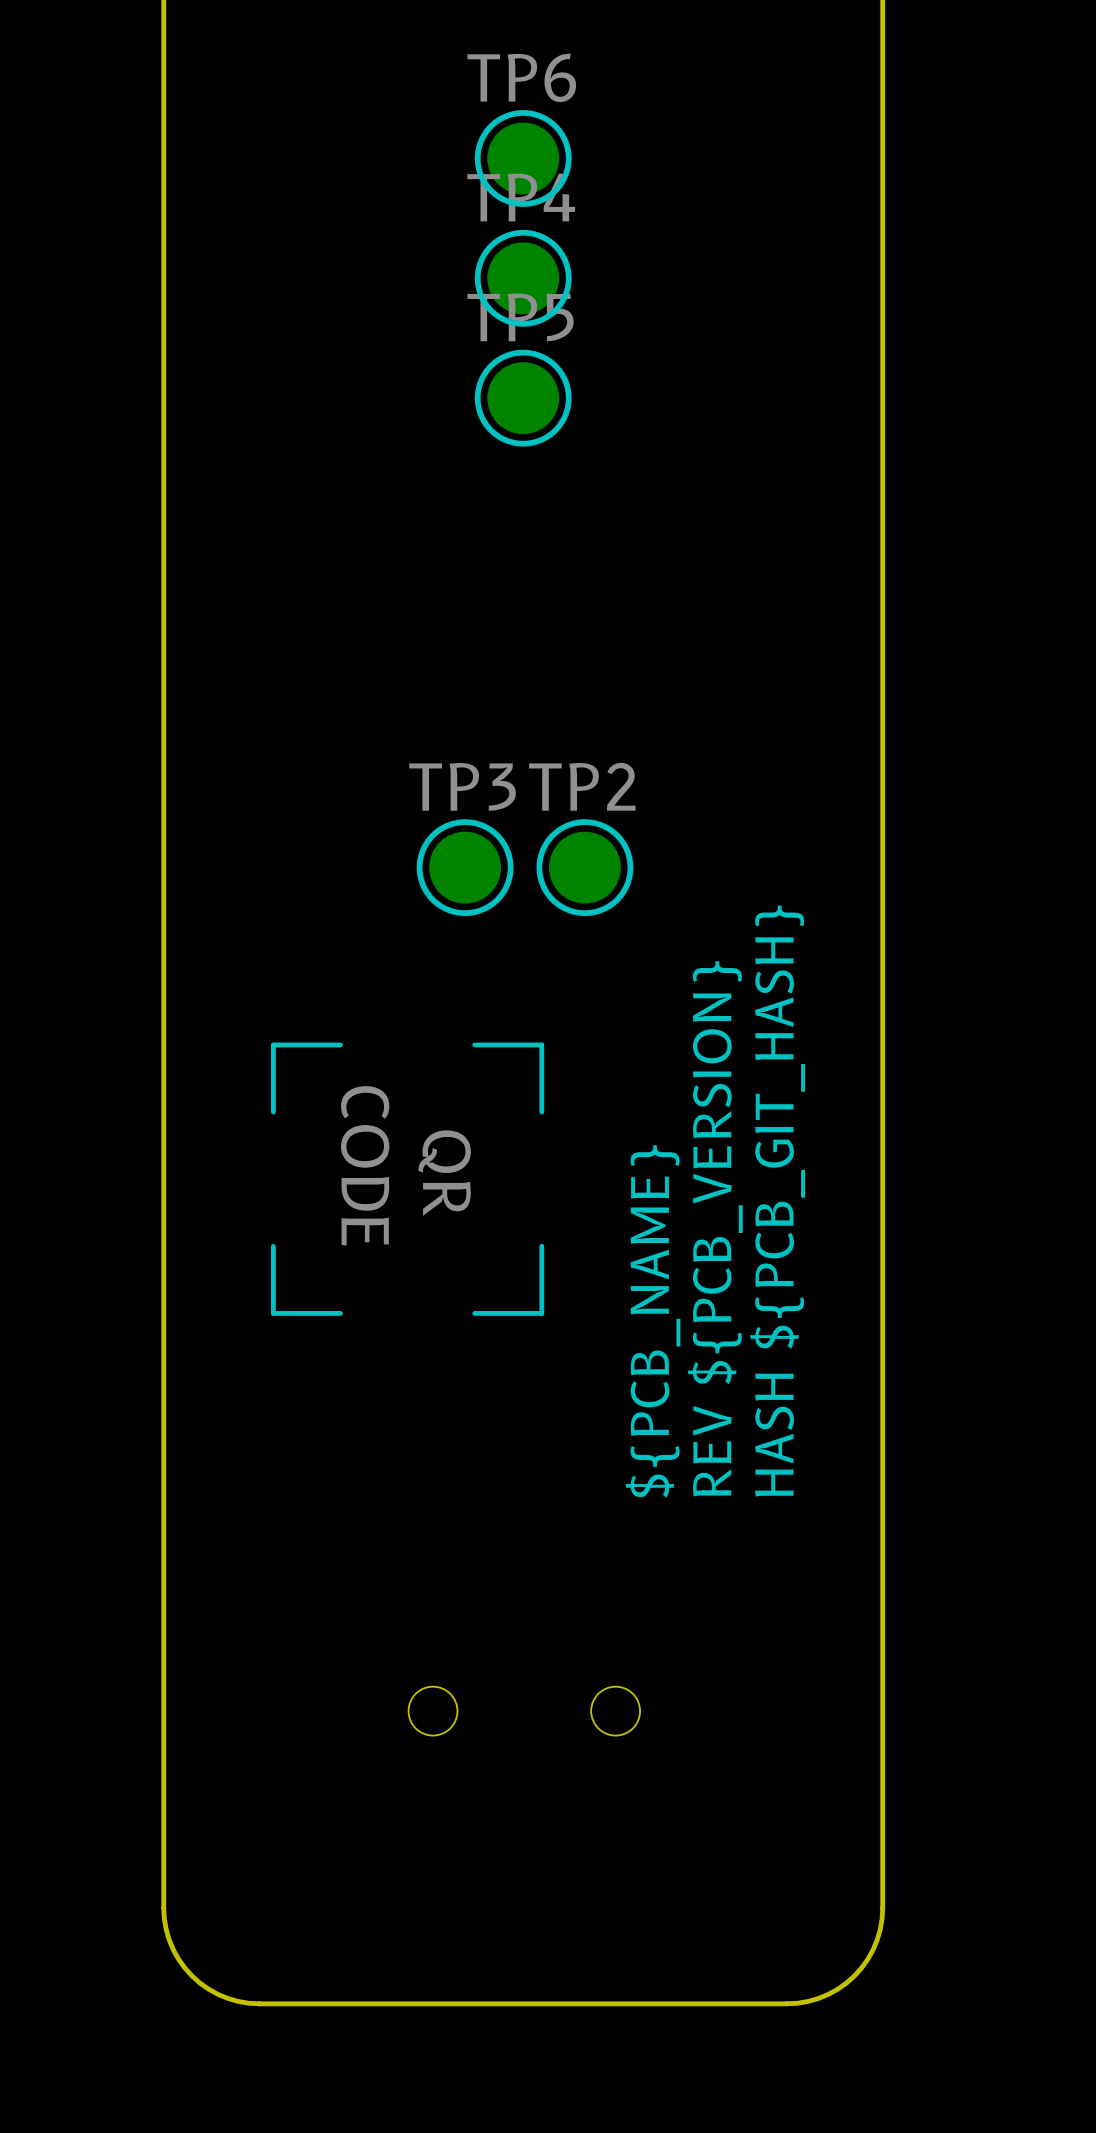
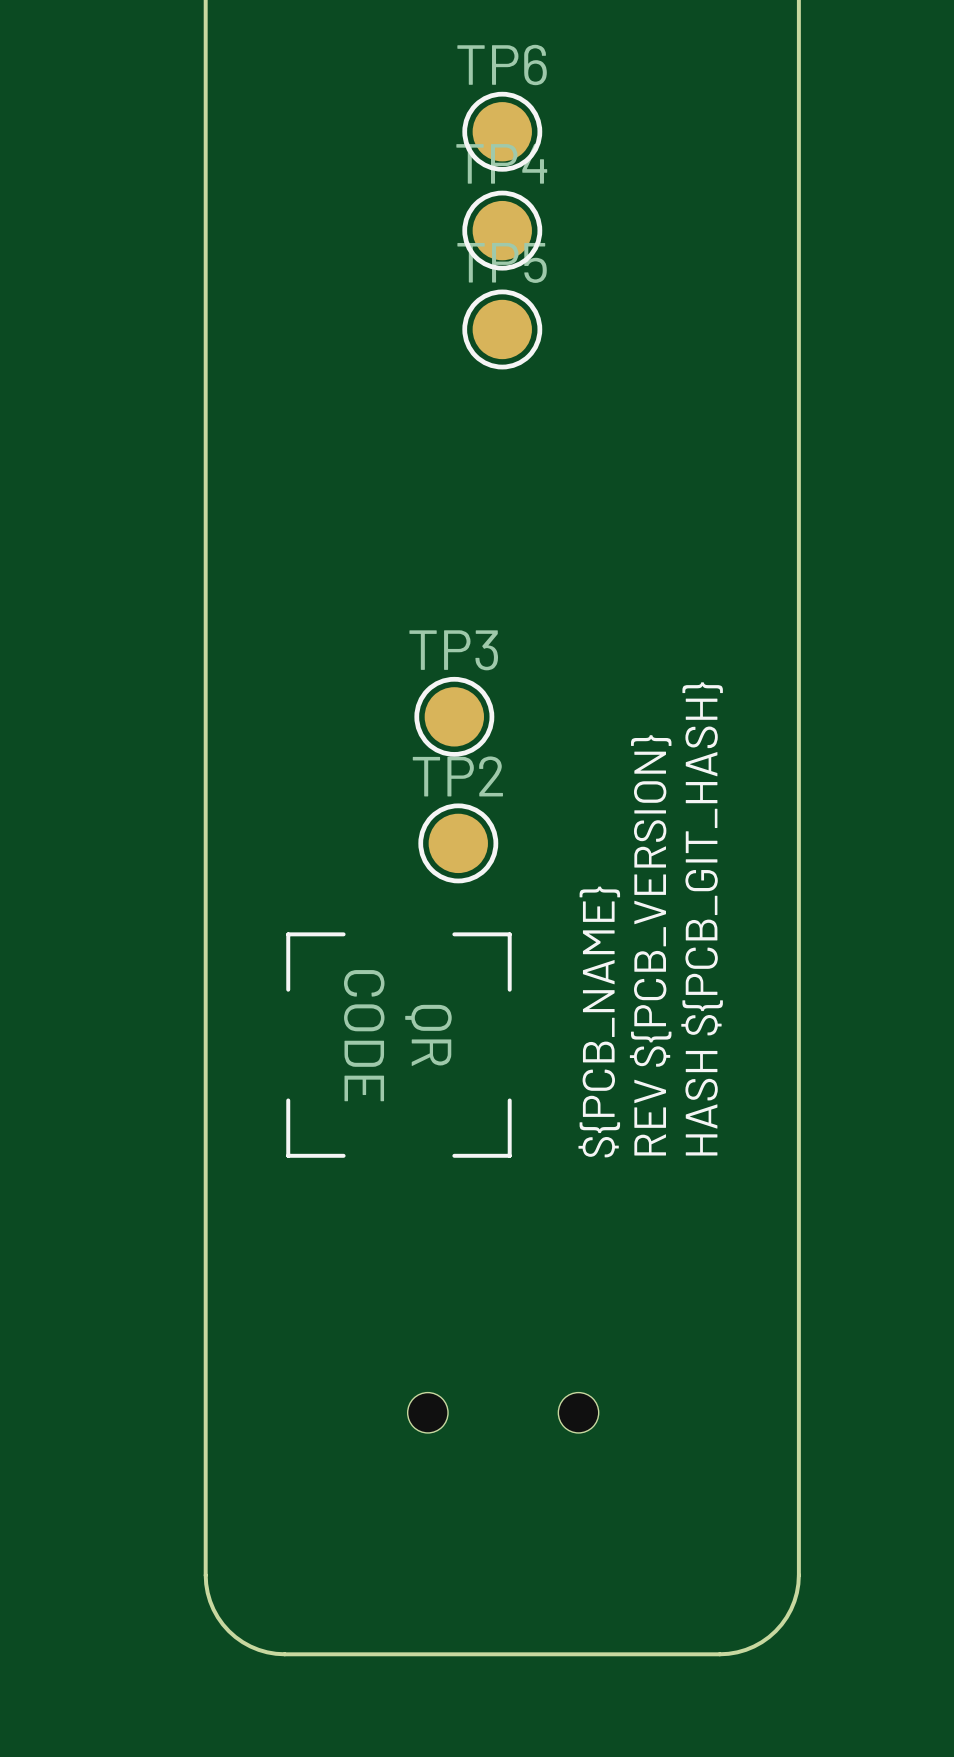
TP2 position: (584, 867) -> (458, 843)
drawing: [270, 1042, 545, 1316] -> none
drawing: none -> [286, 932, 512, 1158]

